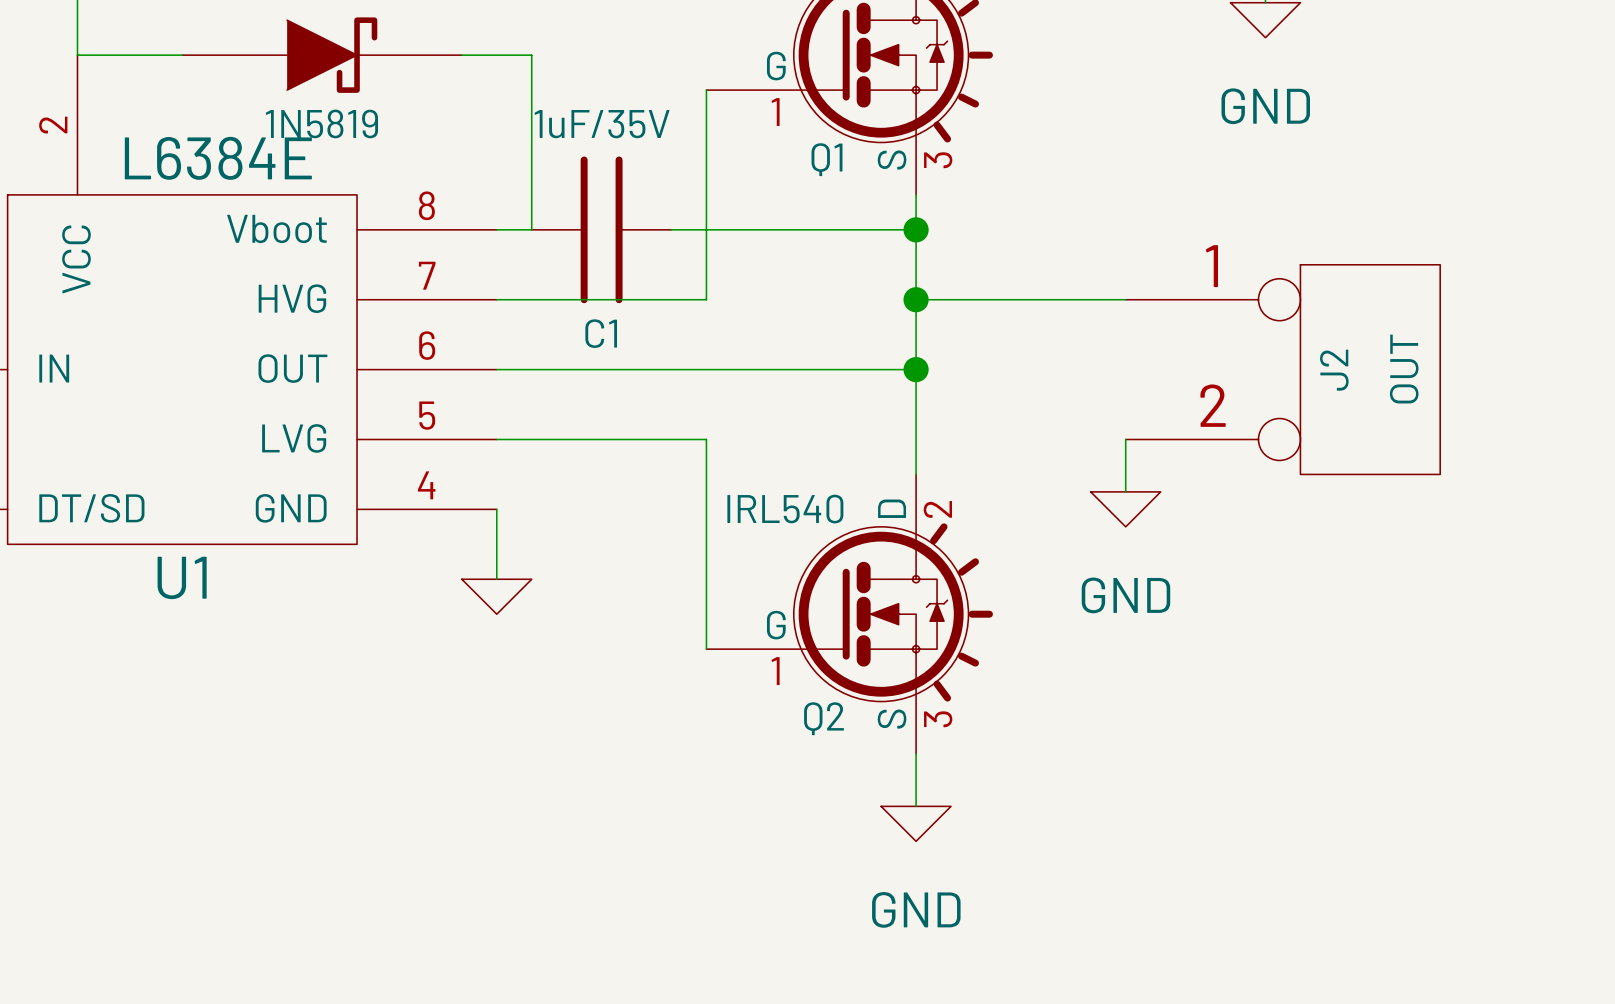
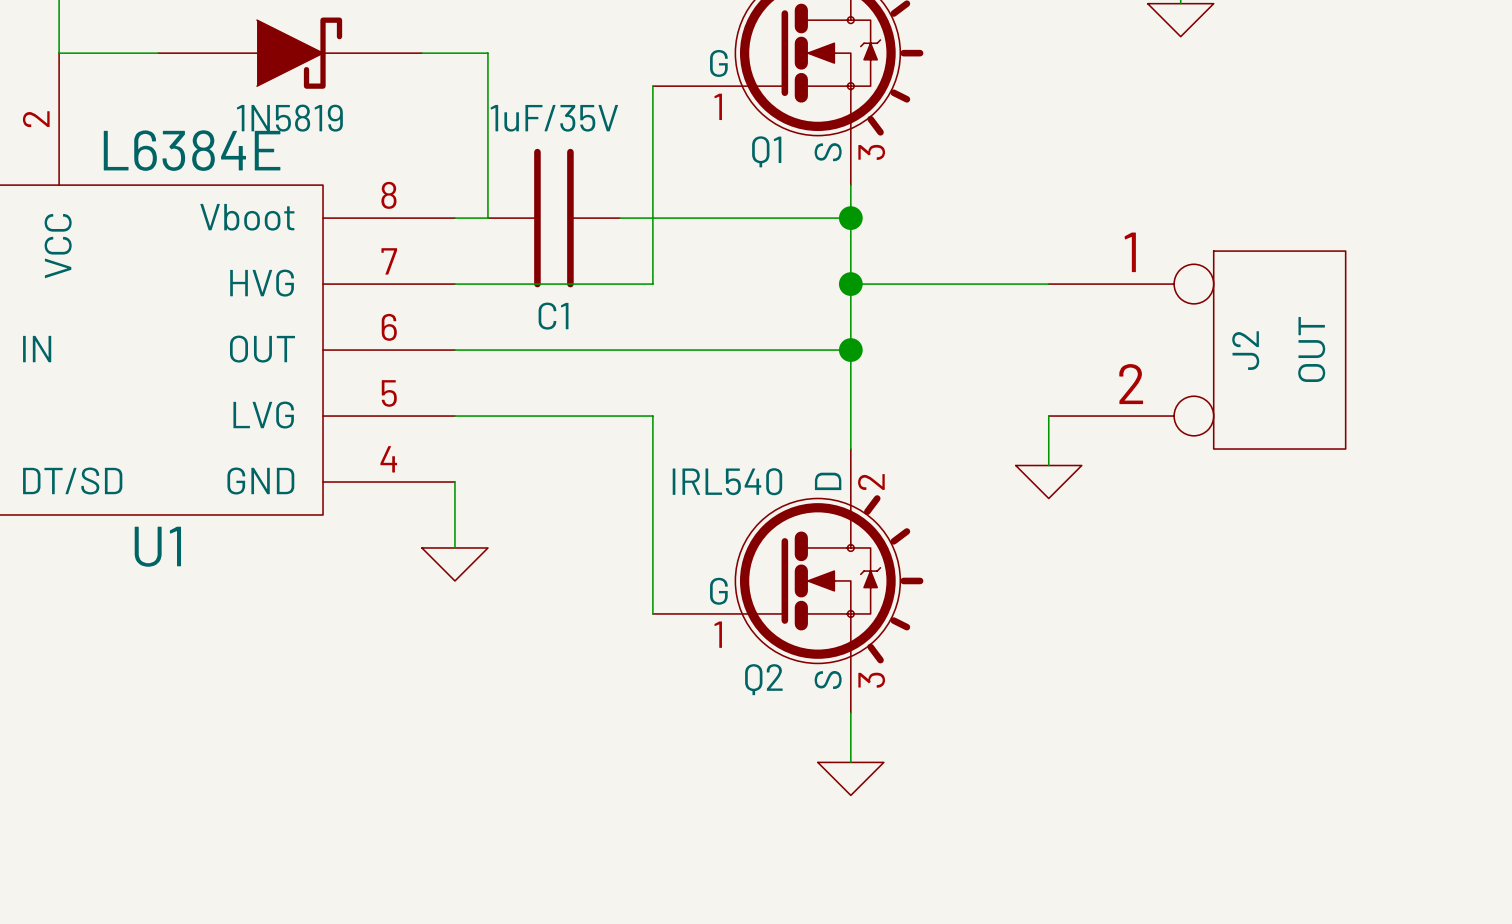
power symbol text: GND (1265, 106) -> none
power symbol text: GND (1125, 595) -> none
power symbol text: GND (916, 909) -> none

